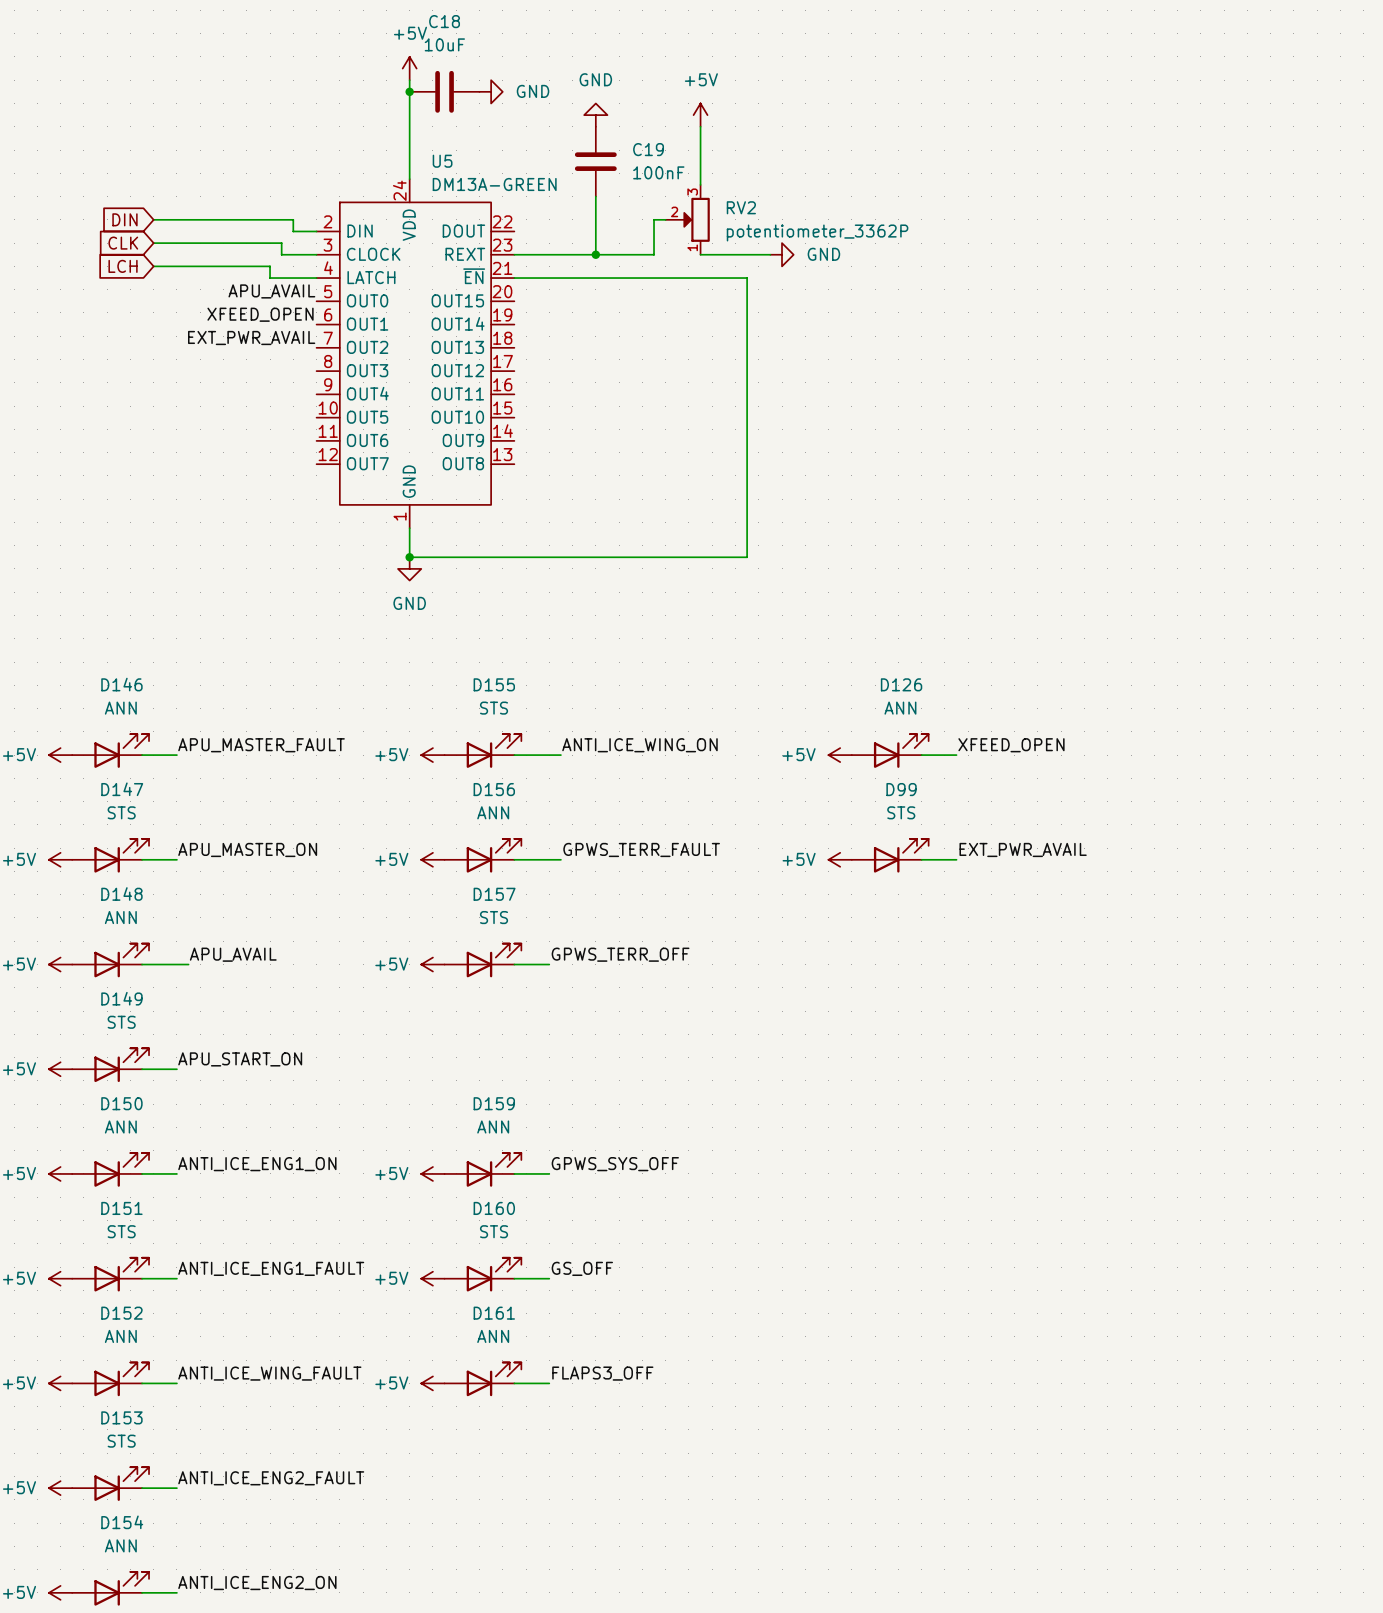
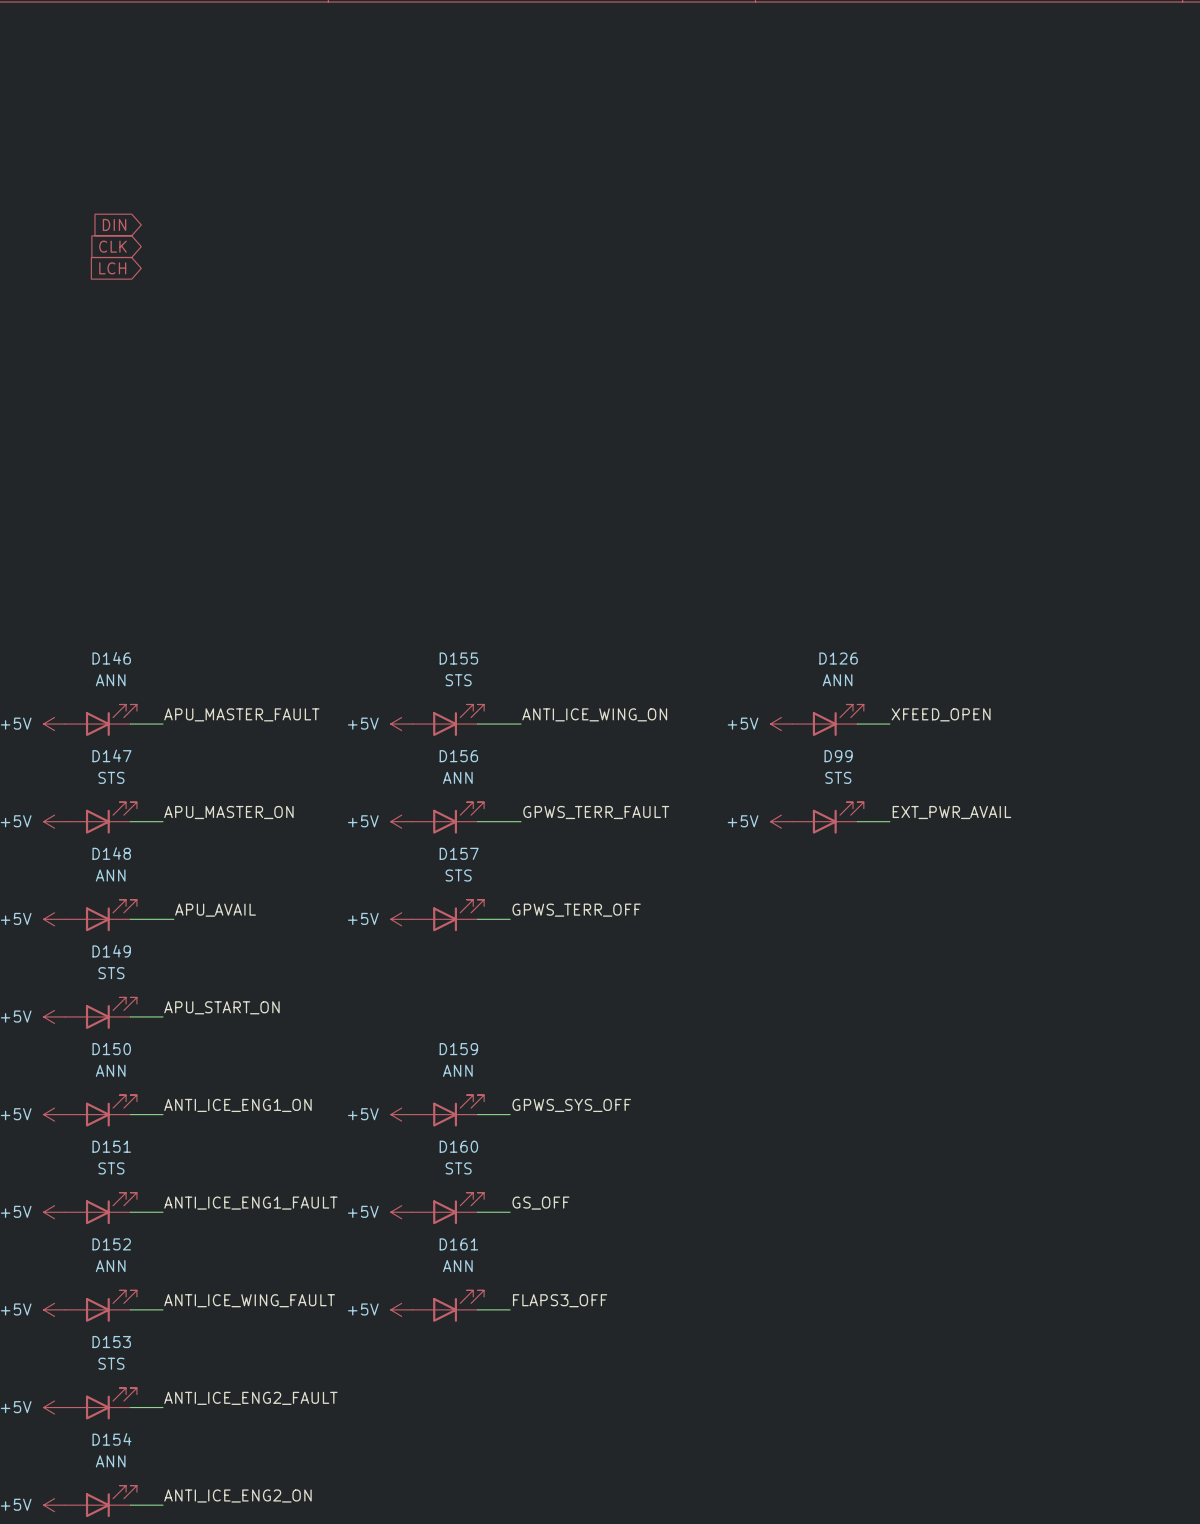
power symbol: +5V (409, 68) -> none
wire: (409, 80) (409, 179) -> none
junction: (409, 91) -> none
C18: 10uF (444, 91) -> none
power symbol: GND (491, 91) -> none
power symbol: GND (595, 115) -> none
power symbol: +5V (700, 115) -> none
wire: (700, 126) (700, 184) -> none
C19: 100nF (595, 161) -> none
wire: (595, 196) (595, 254) -> none
wire: (153, 219) (293, 219) (293, 231) (316, 231) -> none
wire: (665, 219) (654, 219) (654, 254) (514, 254) -> none
RV2: potentiometer_3362P (687, 219) -> none
wire: (153, 243) (281, 243) (281, 254) (316, 254) -> none
junction: (595, 254) -> none
wire: (700, 254) (770, 254) -> none
power symbol: GND (782, 254) -> none
wire: (153, 266) (270, 266) (270, 278) (316, 278) -> none
wire: (514, 278) (747, 278) (747, 557) (409, 557) (409, 528) -> none
label: APU_AVAIL (271, 291) -> none
label: XFEED_OPEN (260, 314) -> none
label: EXT_PWR_AVAIL (251, 338) -> none
U5: DM13A-GREEN (415, 353) -> none
junction: (409, 557) -> none
power symbol: GND (409, 568) -> none

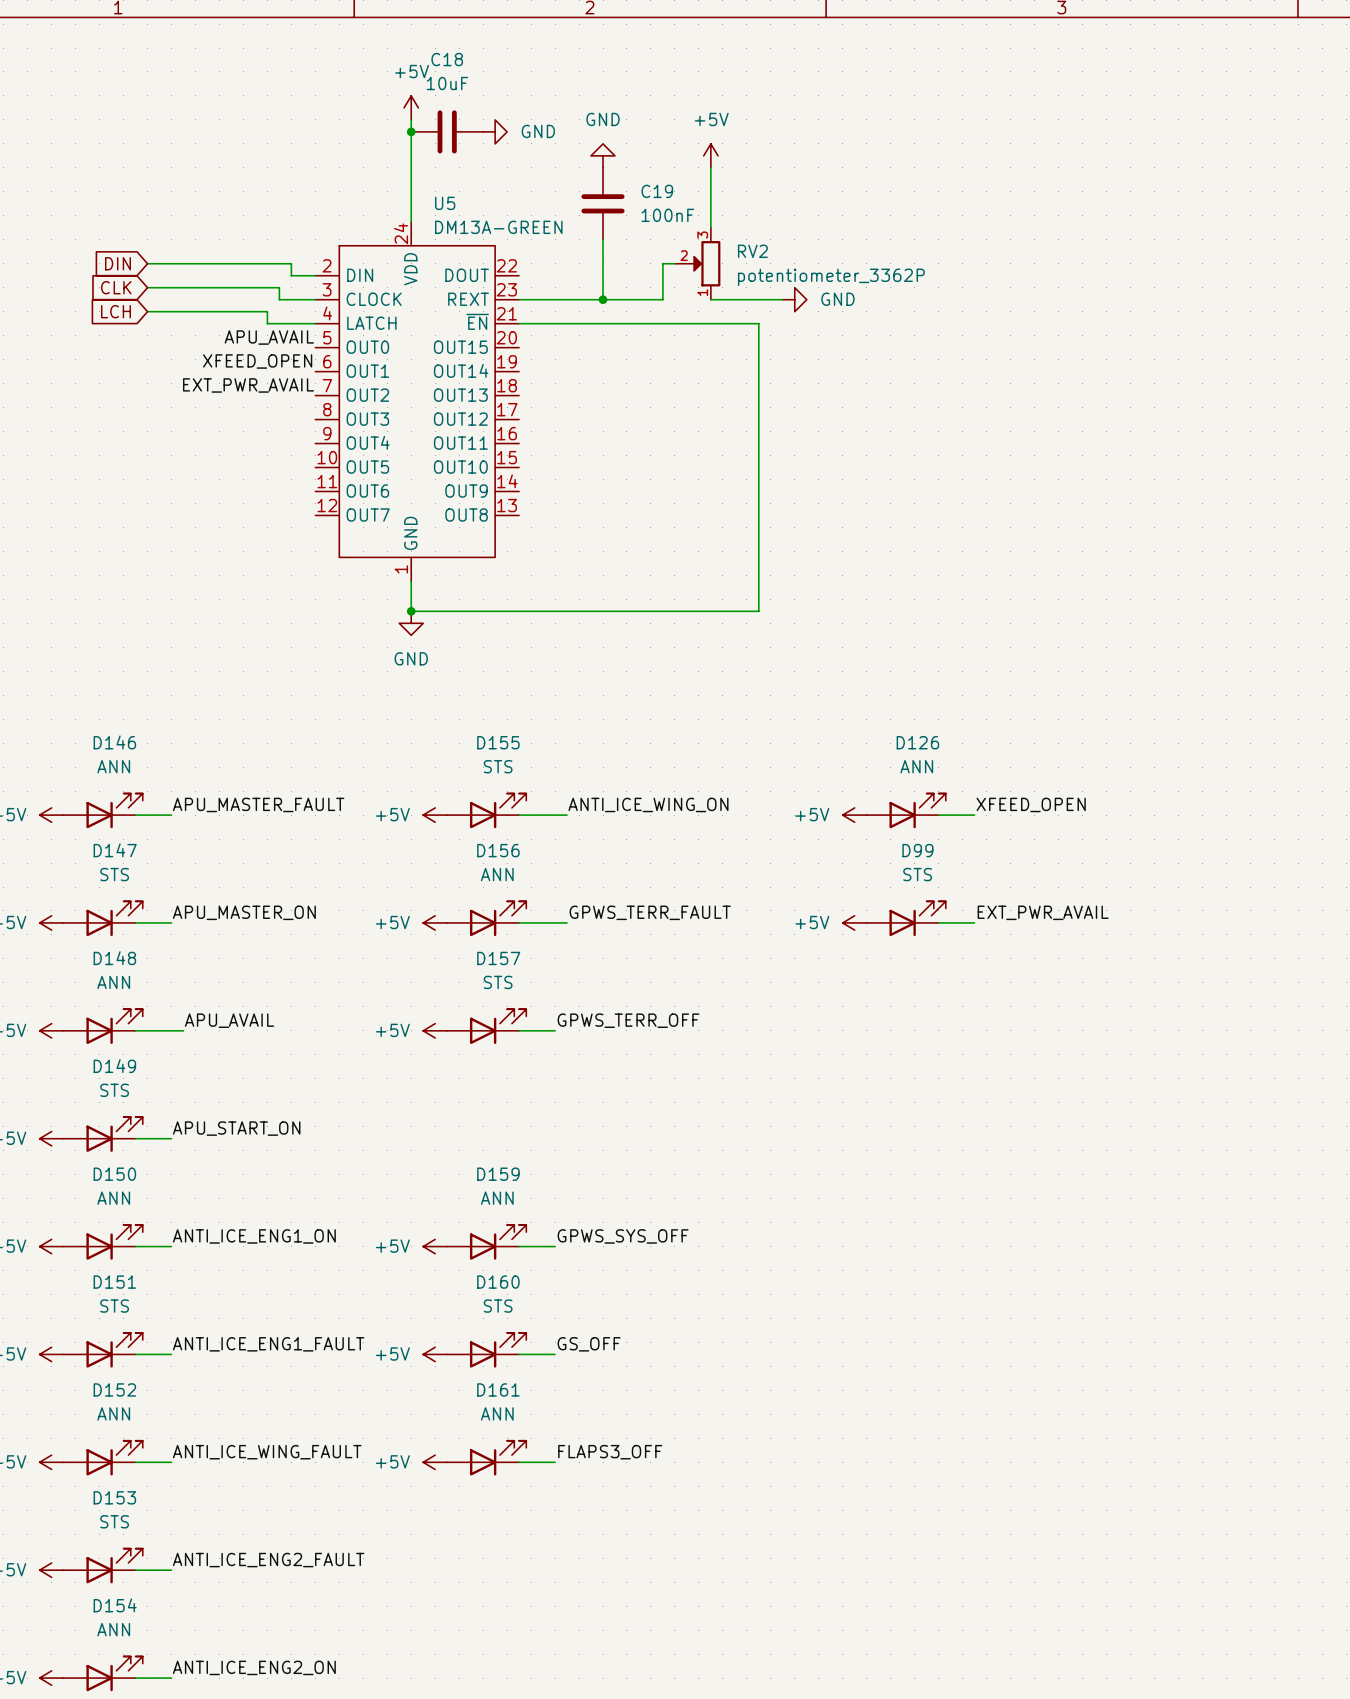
power symbol: none -> +5V (411, 107)
wire: none -> (411, 119) (411, 221)
junction: none -> (411, 131)
C18: none -> 10uF (447, 131)
power symbol: none -> GND (495, 131)
power symbol: none -> GND (603, 155)
power symbol: none -> +5V (710, 155)
wire: none -> (710, 167) (710, 227)
C19: none -> 100nF (603, 203)
wire: none -> (603, 239) (603, 299)
wire: none -> (147, 263) (291, 263) (291, 275) (315, 275)
wire: none -> (674, 263) (662, 263) (662, 299) (519, 299)
RV2: none -> potentiometer_3362P (697, 263)
wire: none -> (147, 287) (279, 287) (279, 299) (315, 299)
junction: none -> (603, 299)
wire: none -> (710, 299) (782, 299)
power symbol: none -> GND (794, 299)
wire: none -> (147, 311) (267, 311) (267, 323) (315, 323)
wire: none -> (519, 323) (758, 323) (758, 611) (411, 611) (411, 581)
label: none -> APU_AVAIL (269, 337)
label: none -> XFEED_OPEN (257, 361)
label: none -> EXT_PWR_AVAIL (248, 385)
U5: none -> DM13A-GREEN (417, 401)
junction: none -> (411, 611)
power symbol: none -> GND (411, 623)

